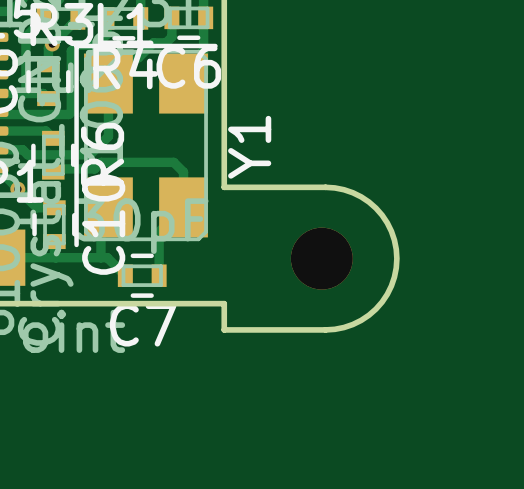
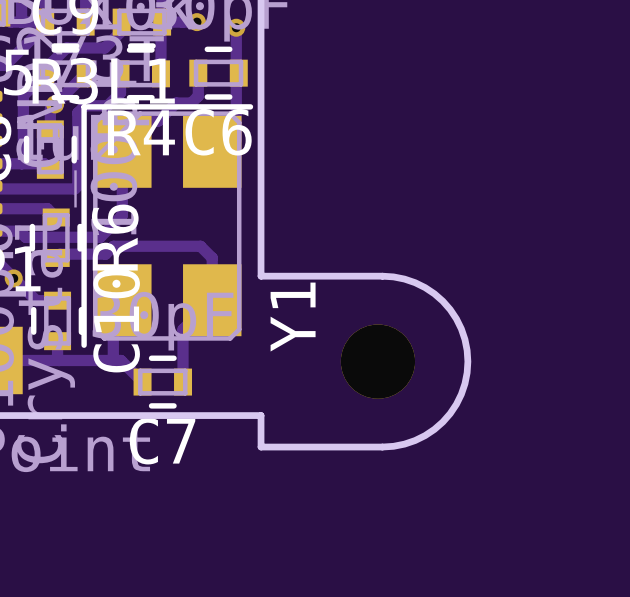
Y1 name position: Y1 (249, 147) -> Y1 (293, 317)

